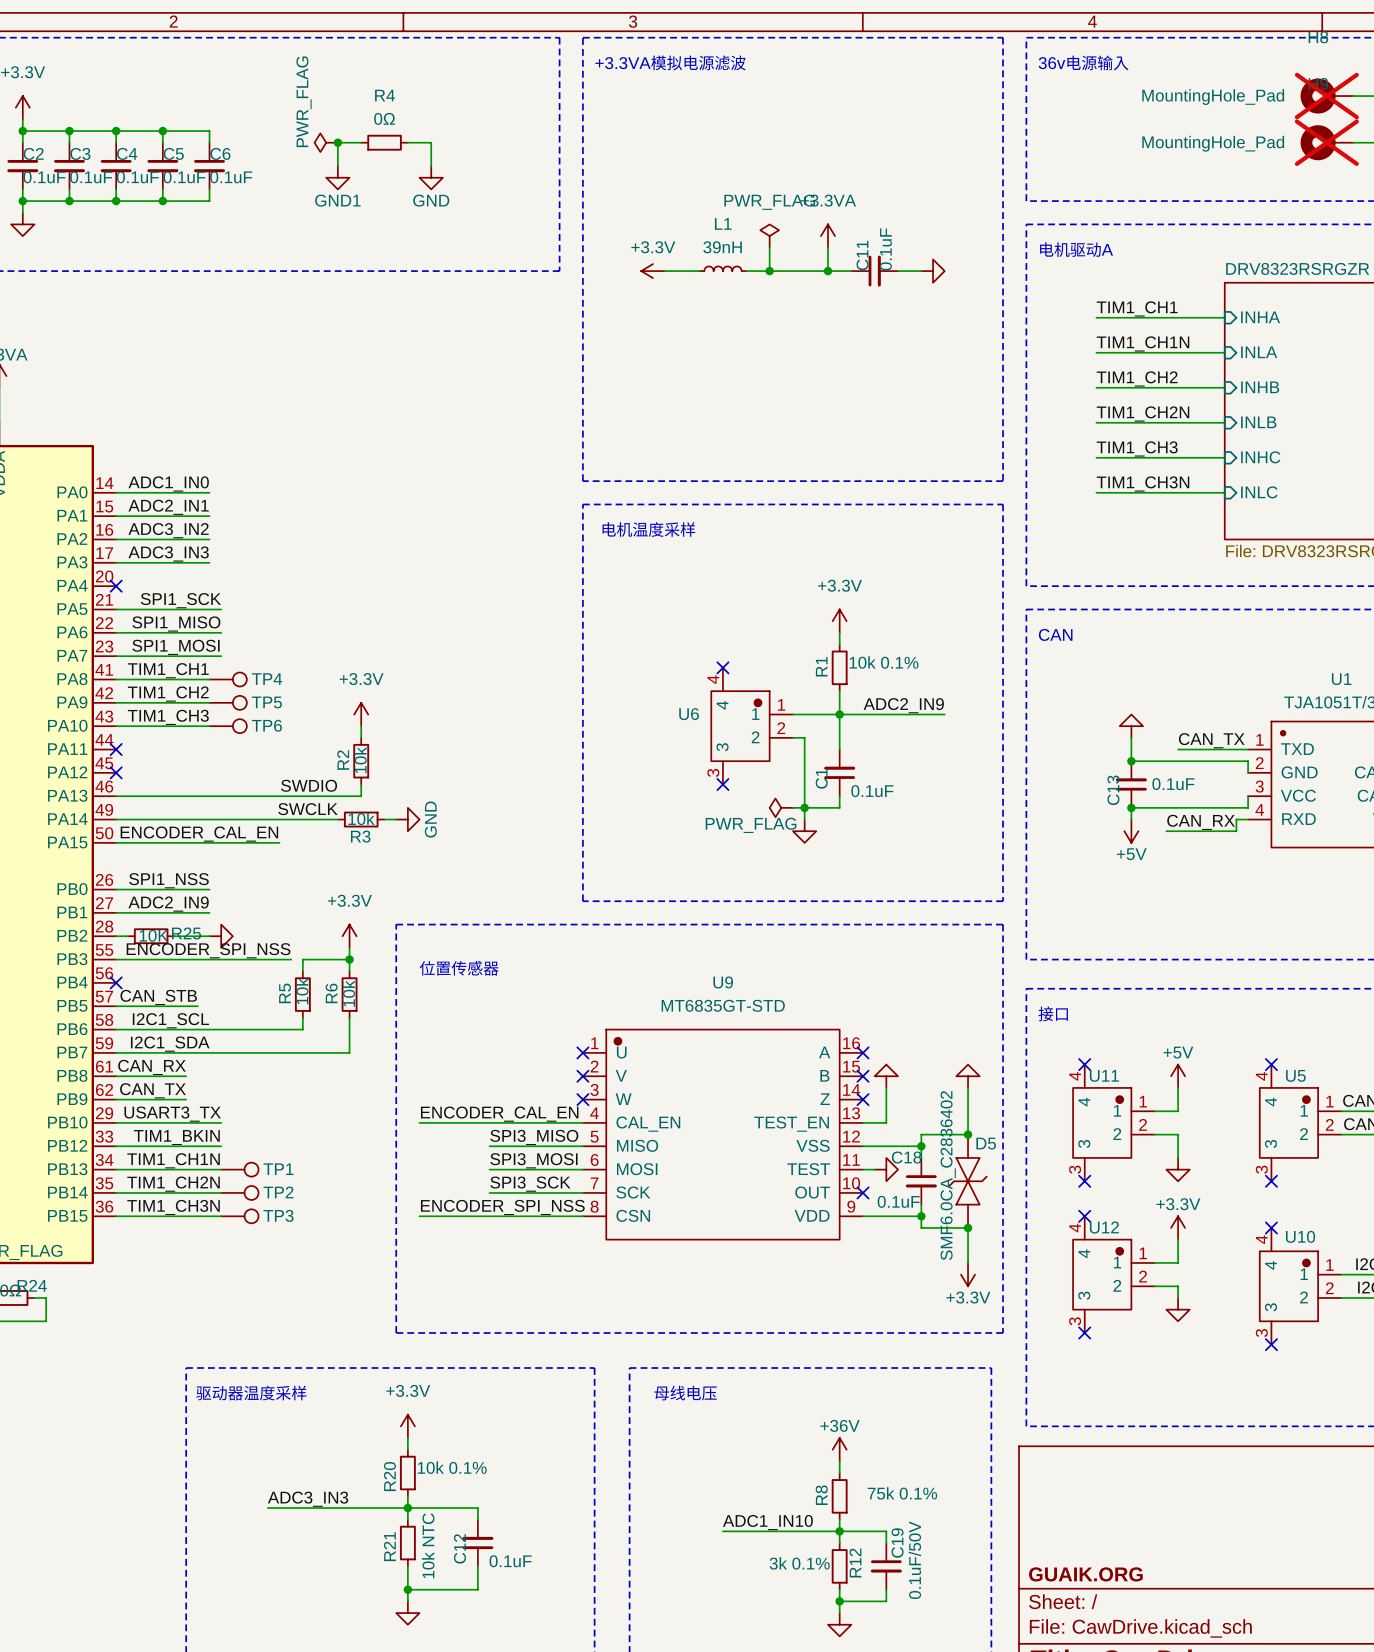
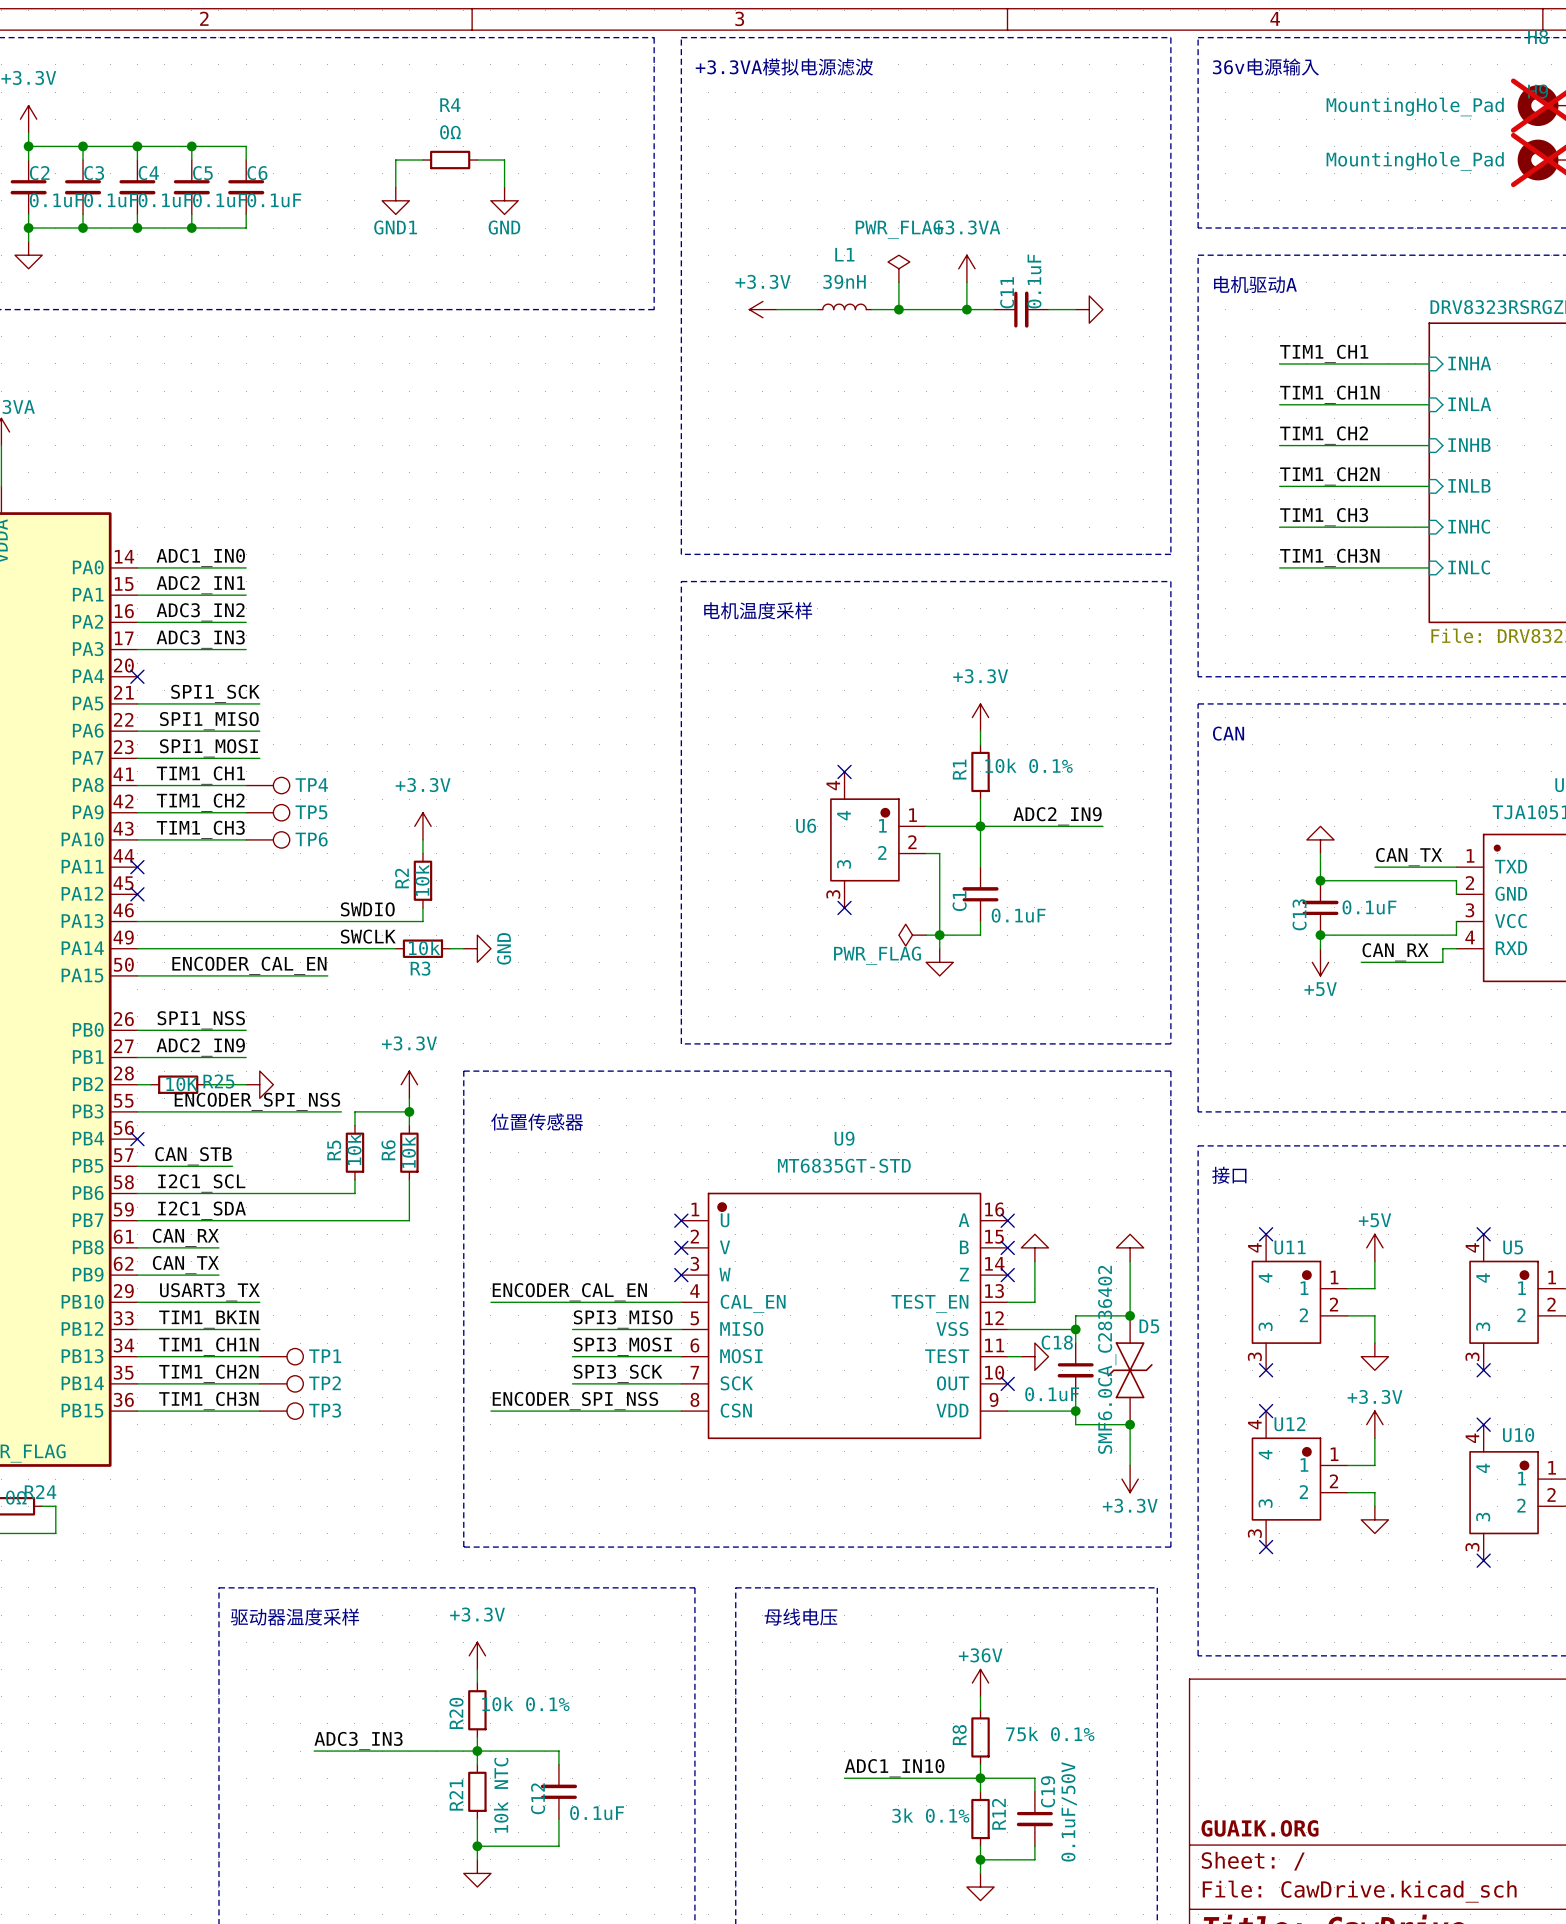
power symbol: PWR_FLAG (326, 142) -> none
junction: (337, 142) -> none

